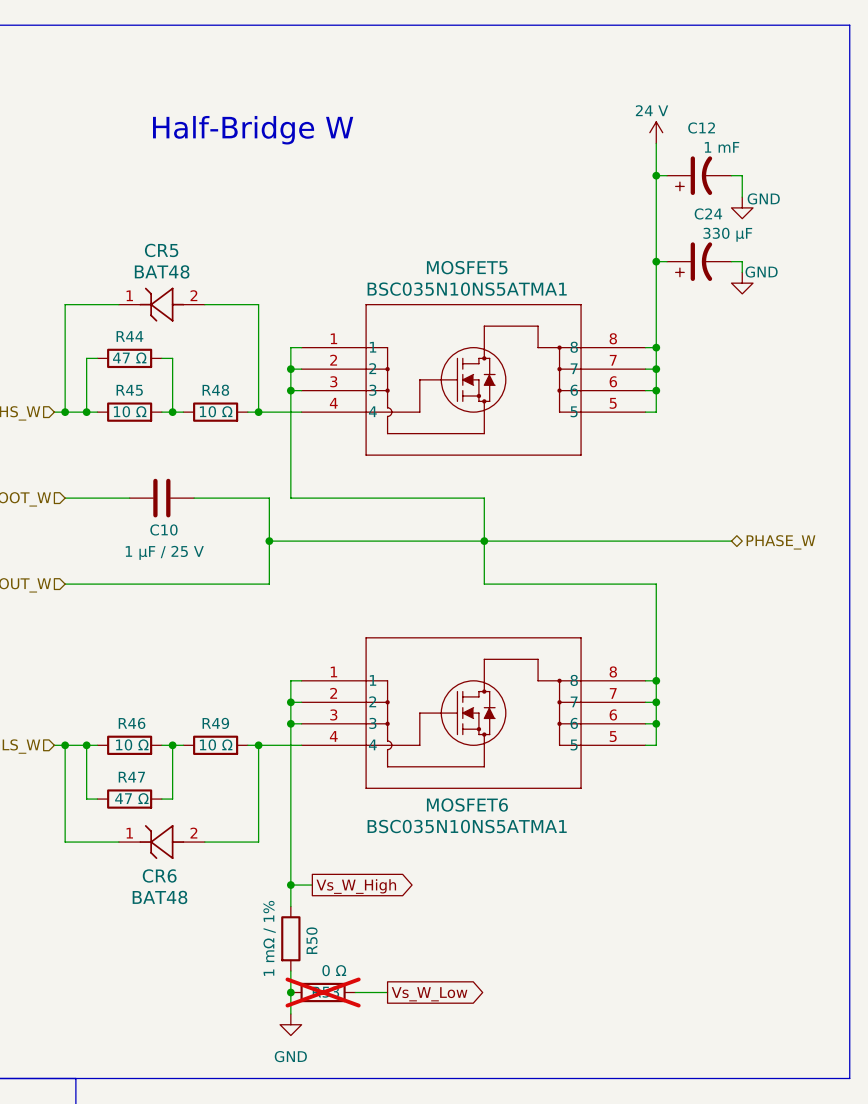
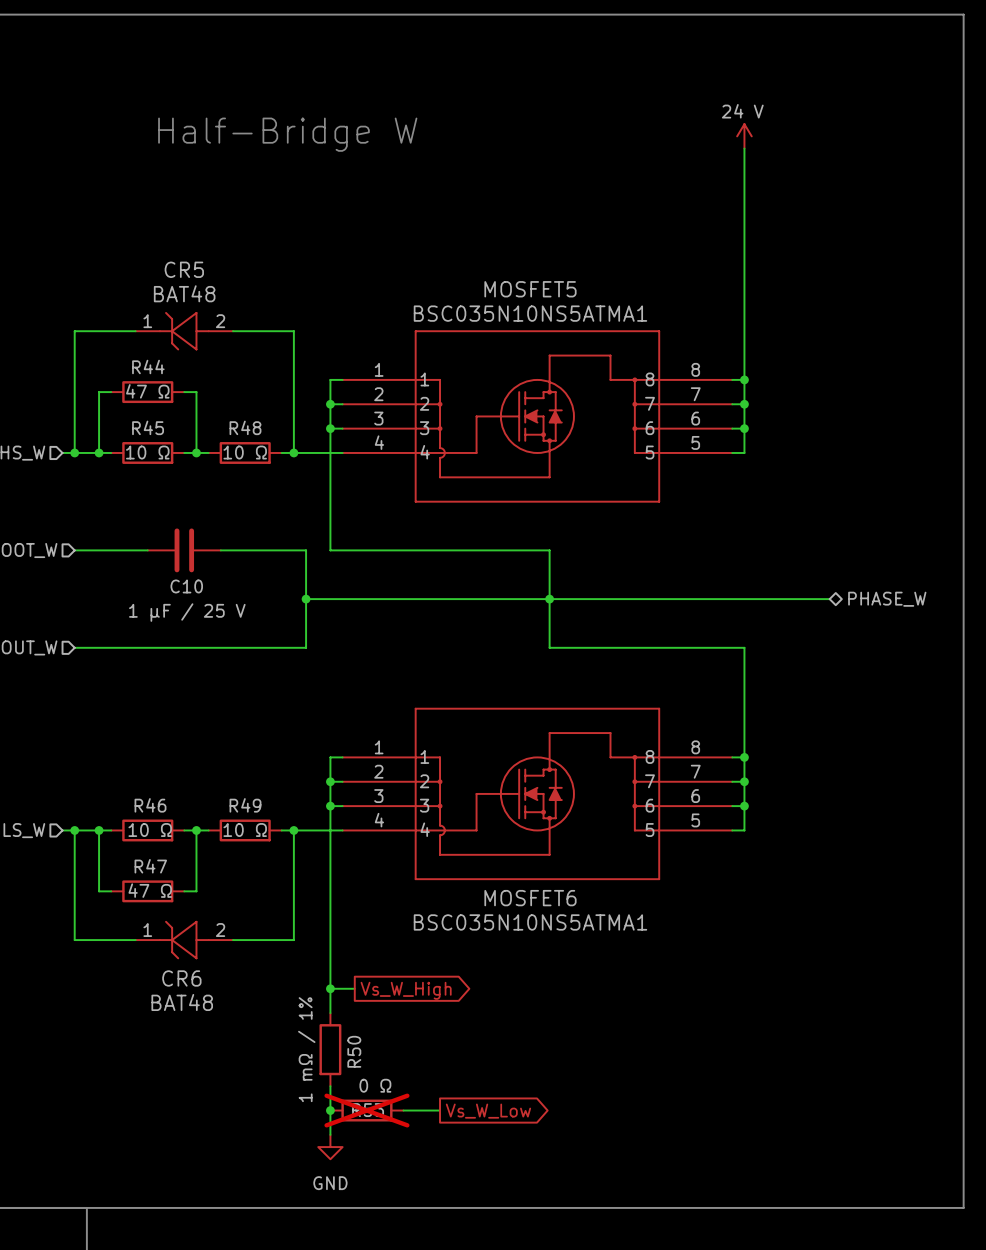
wire: (656, 175) (667, 175) -> none
junction: (656, 175) -> none
C12: 1 mF (699, 175) -> none
wire: (731, 175) (742, 175) (742, 197) -> none
power symbol: GND (742, 207) -> none
wire: (656, 261) (667, 261) -> none
junction: (656, 261) -> none
C24: 330 μF (699, 261) -> none
wire: (731, 261) (742, 261) (742, 272) -> none
power symbol: GND (742, 283) -> none

